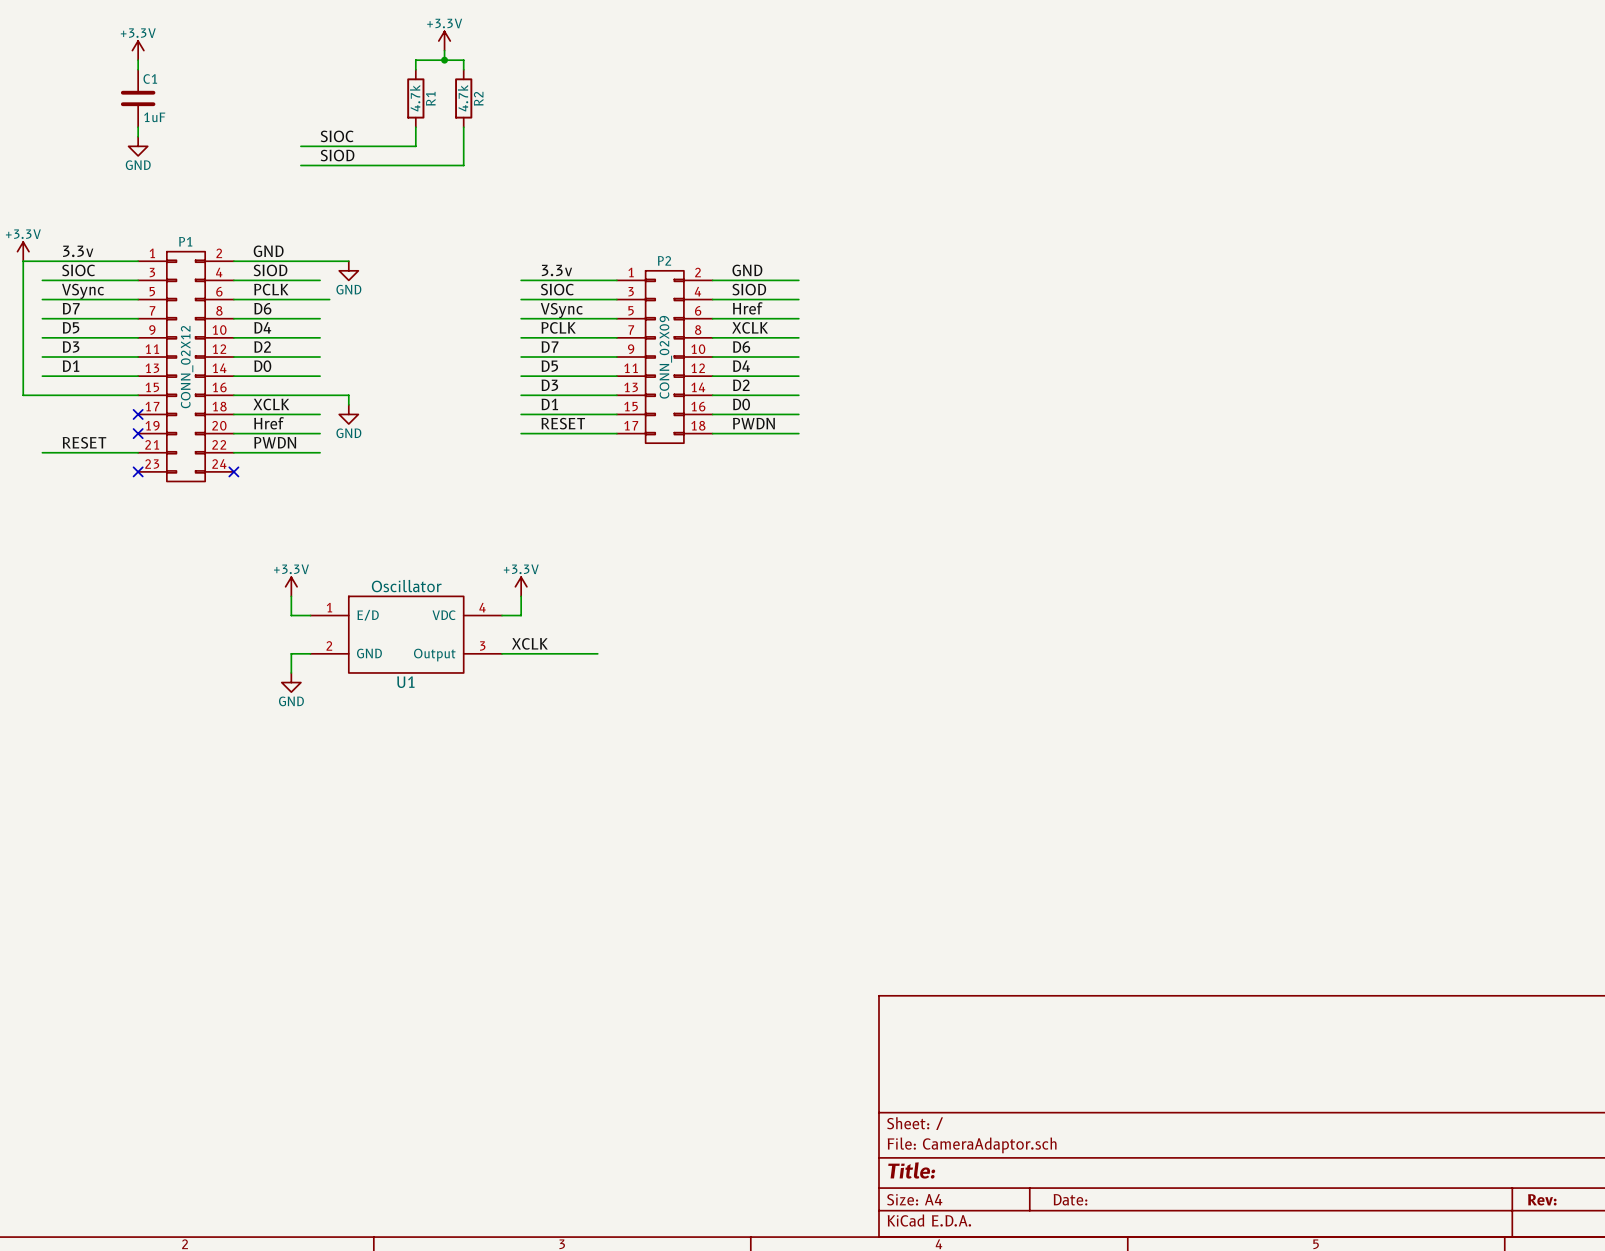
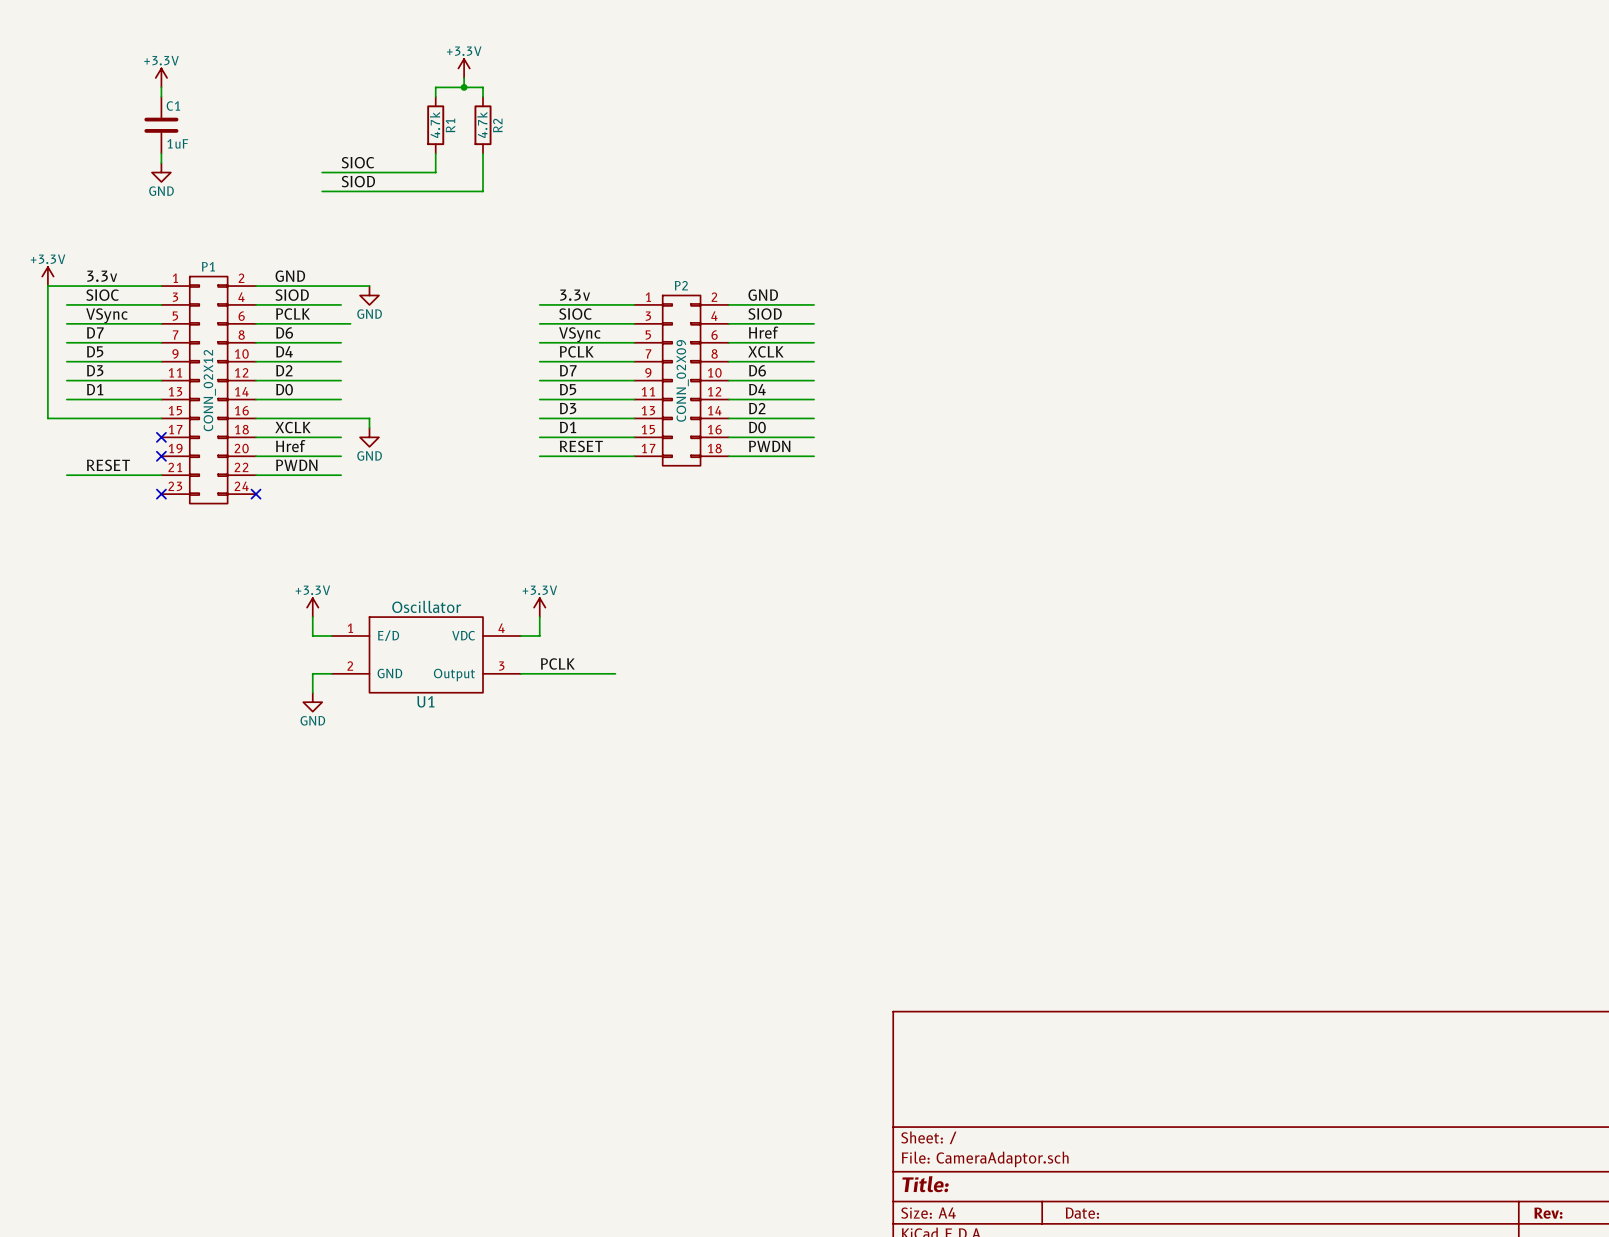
label: XCLK (529, 643) -> PCLK (557, 663)

